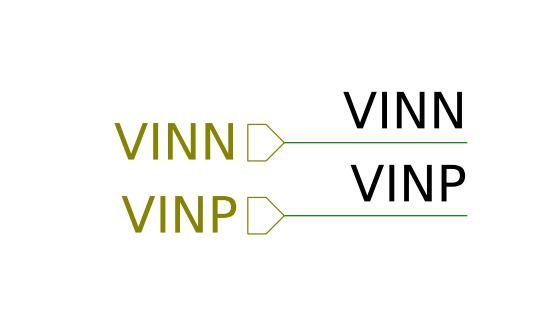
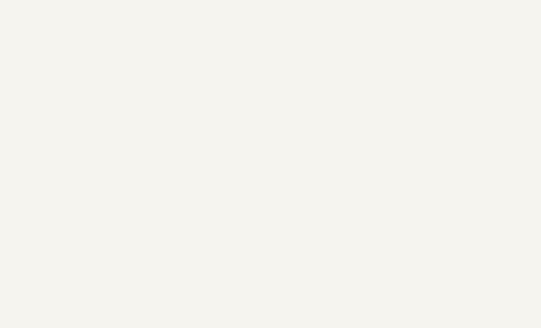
label: VINN (402, 110) -> none
hierarchical label: VINN (173, 141) -> none
wire: (284, 142) (466, 142) -> none
label: VINP (407, 183) -> none
hierarchical label: VINP (178, 214) -> none
wire: (284, 215) (466, 215) -> none

